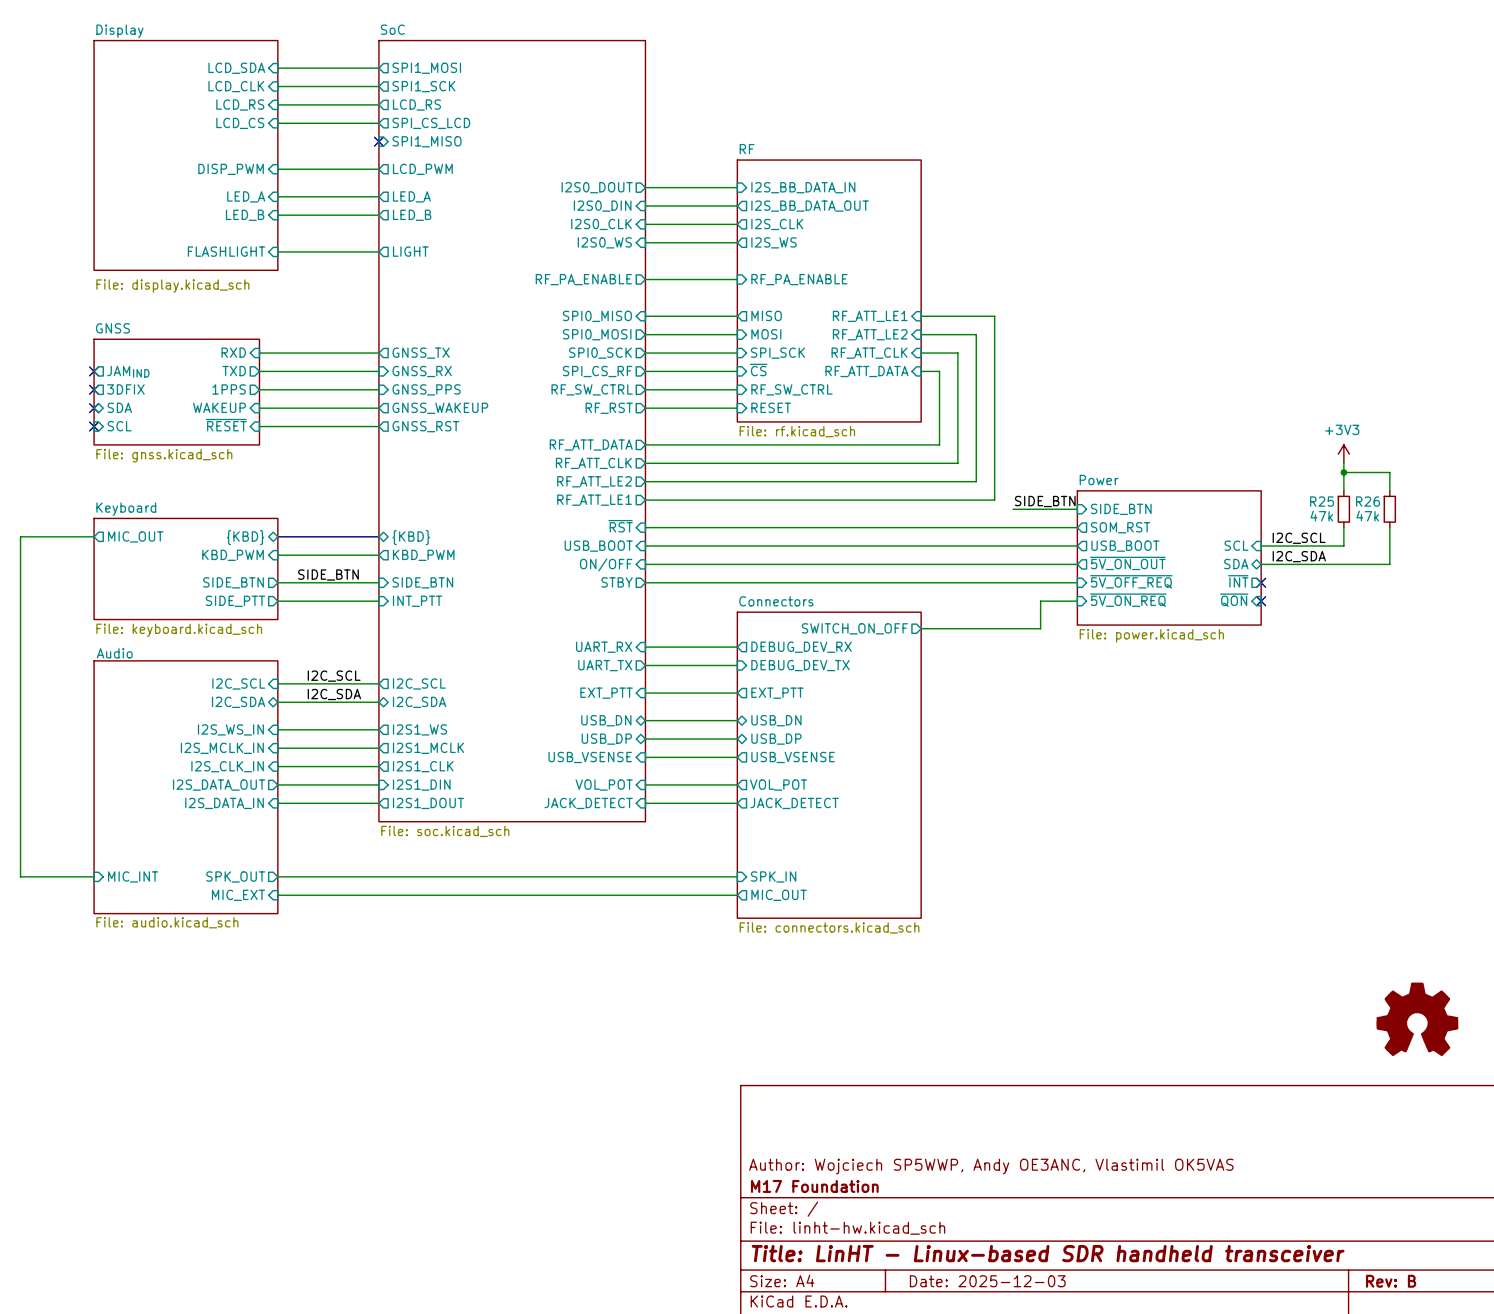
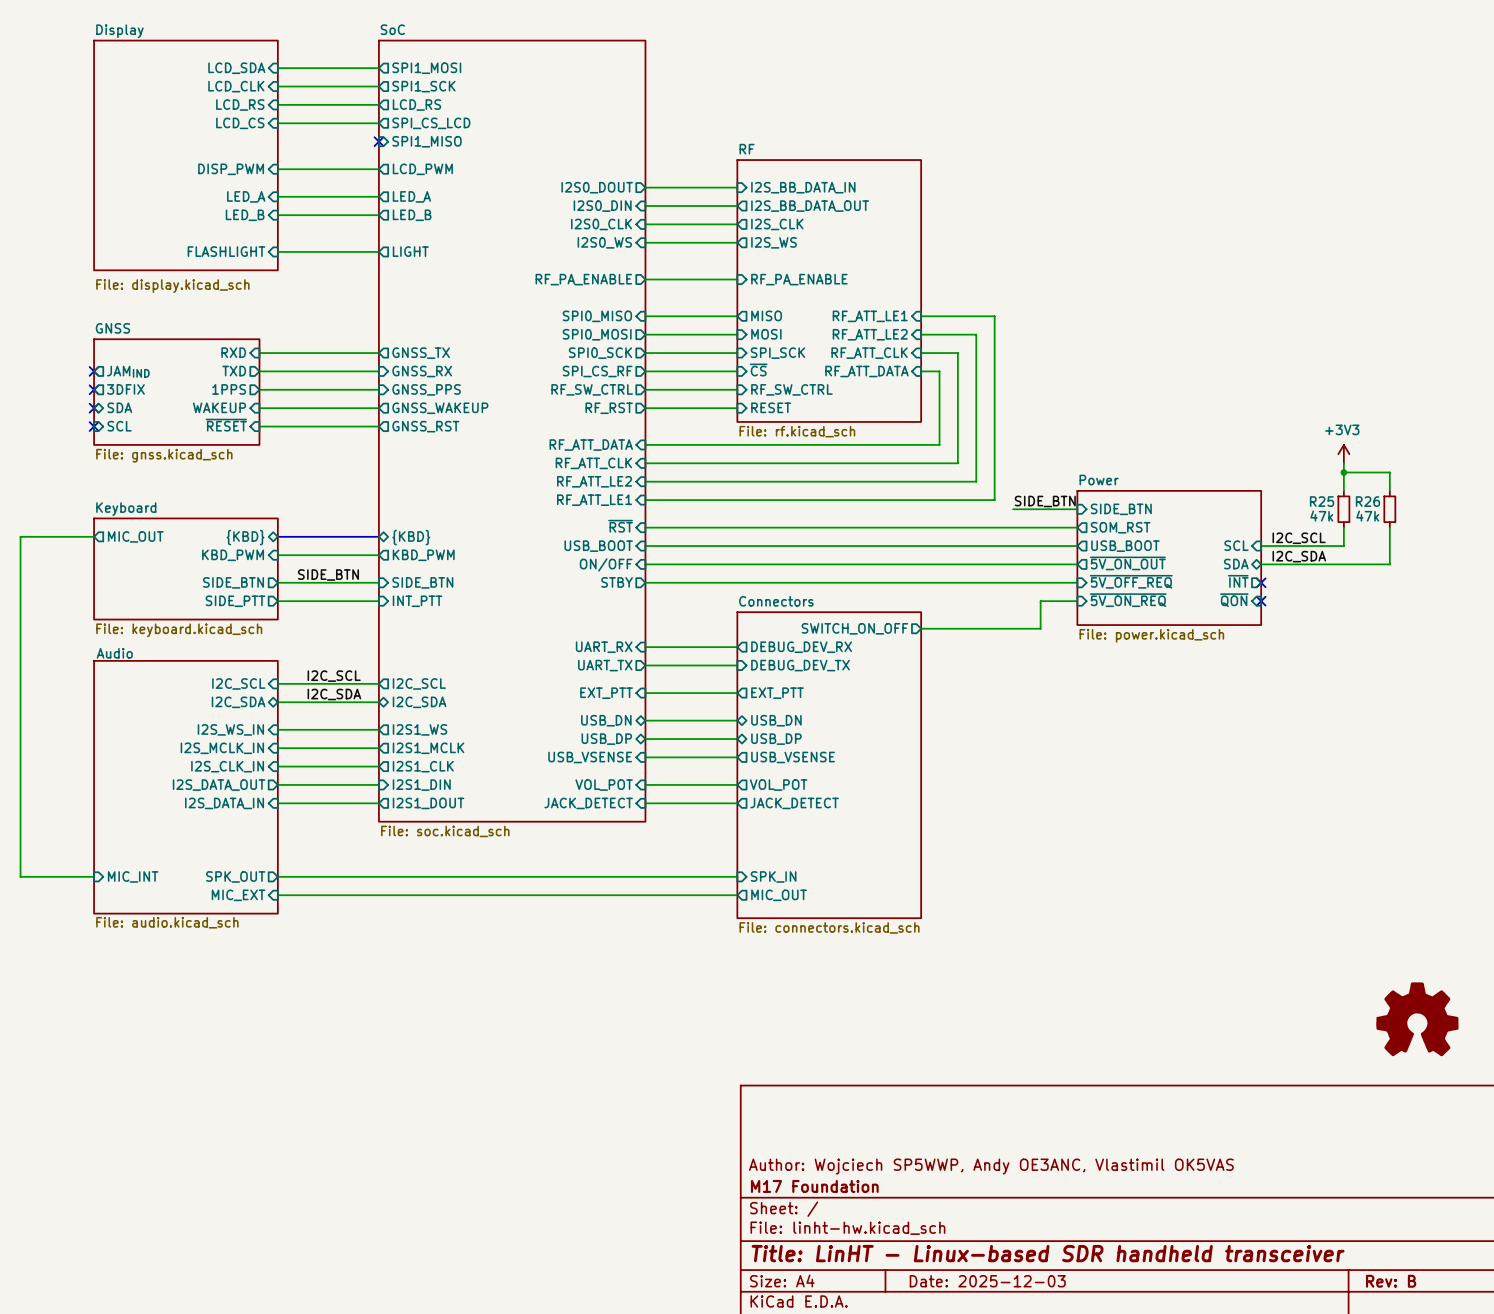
sheet pin shape: output (591, 445) -> input (591, 445)
sheet pin shape: output (593, 463) -> input (593, 463)
sheet pin shape: output (594, 481) -> input (594, 481)
sheet pin shape: output (594, 500) -> input (594, 500)

